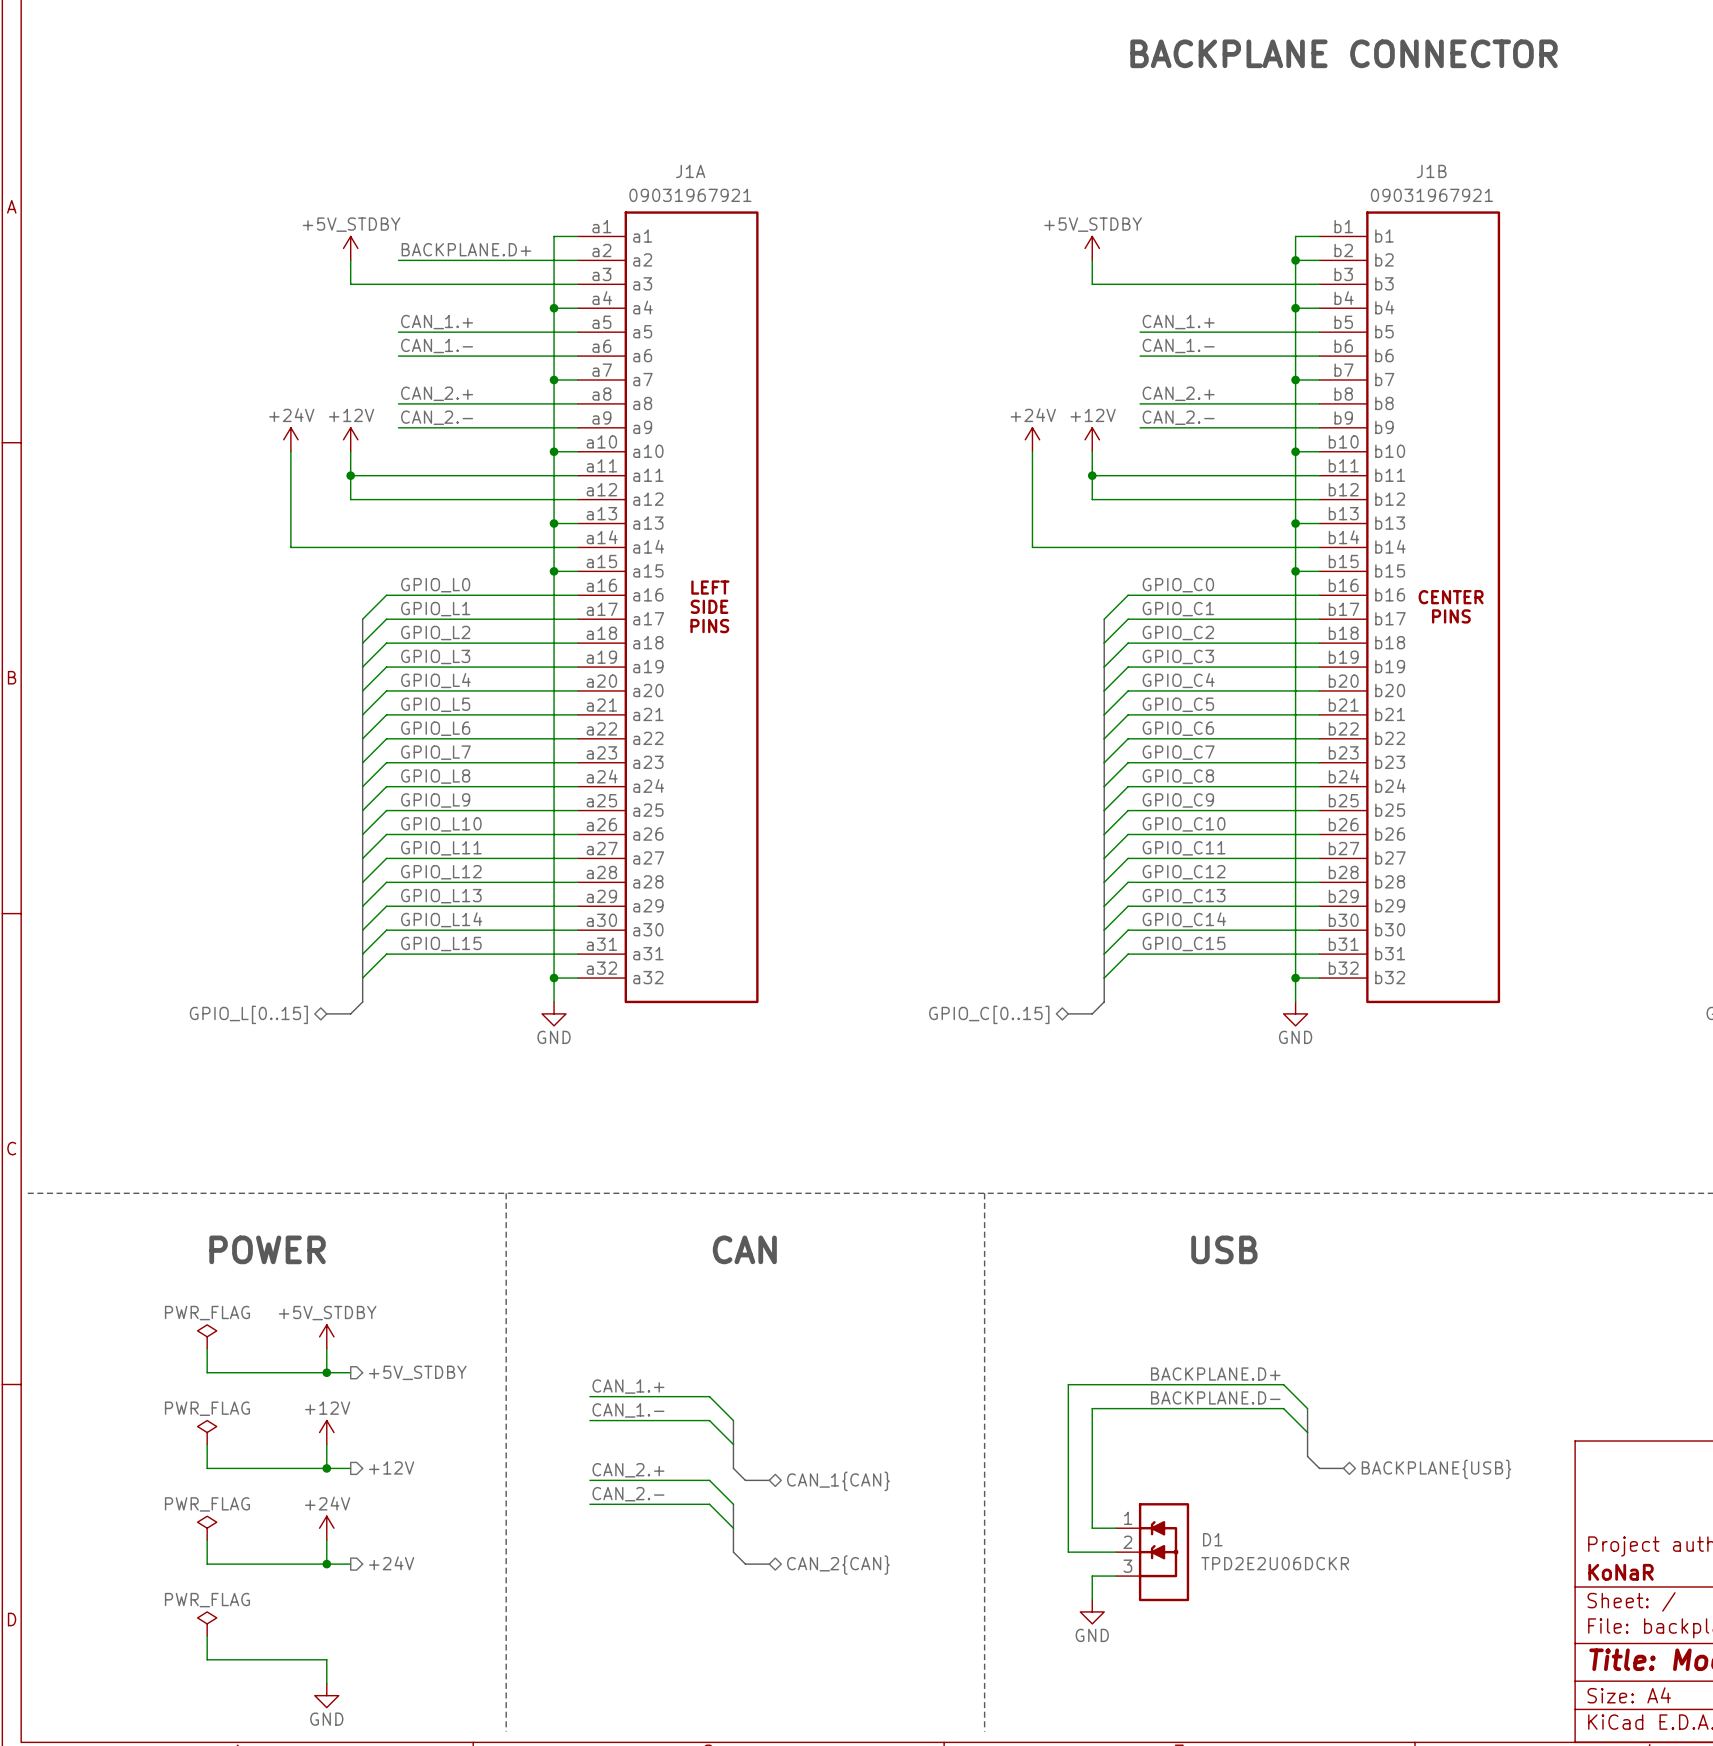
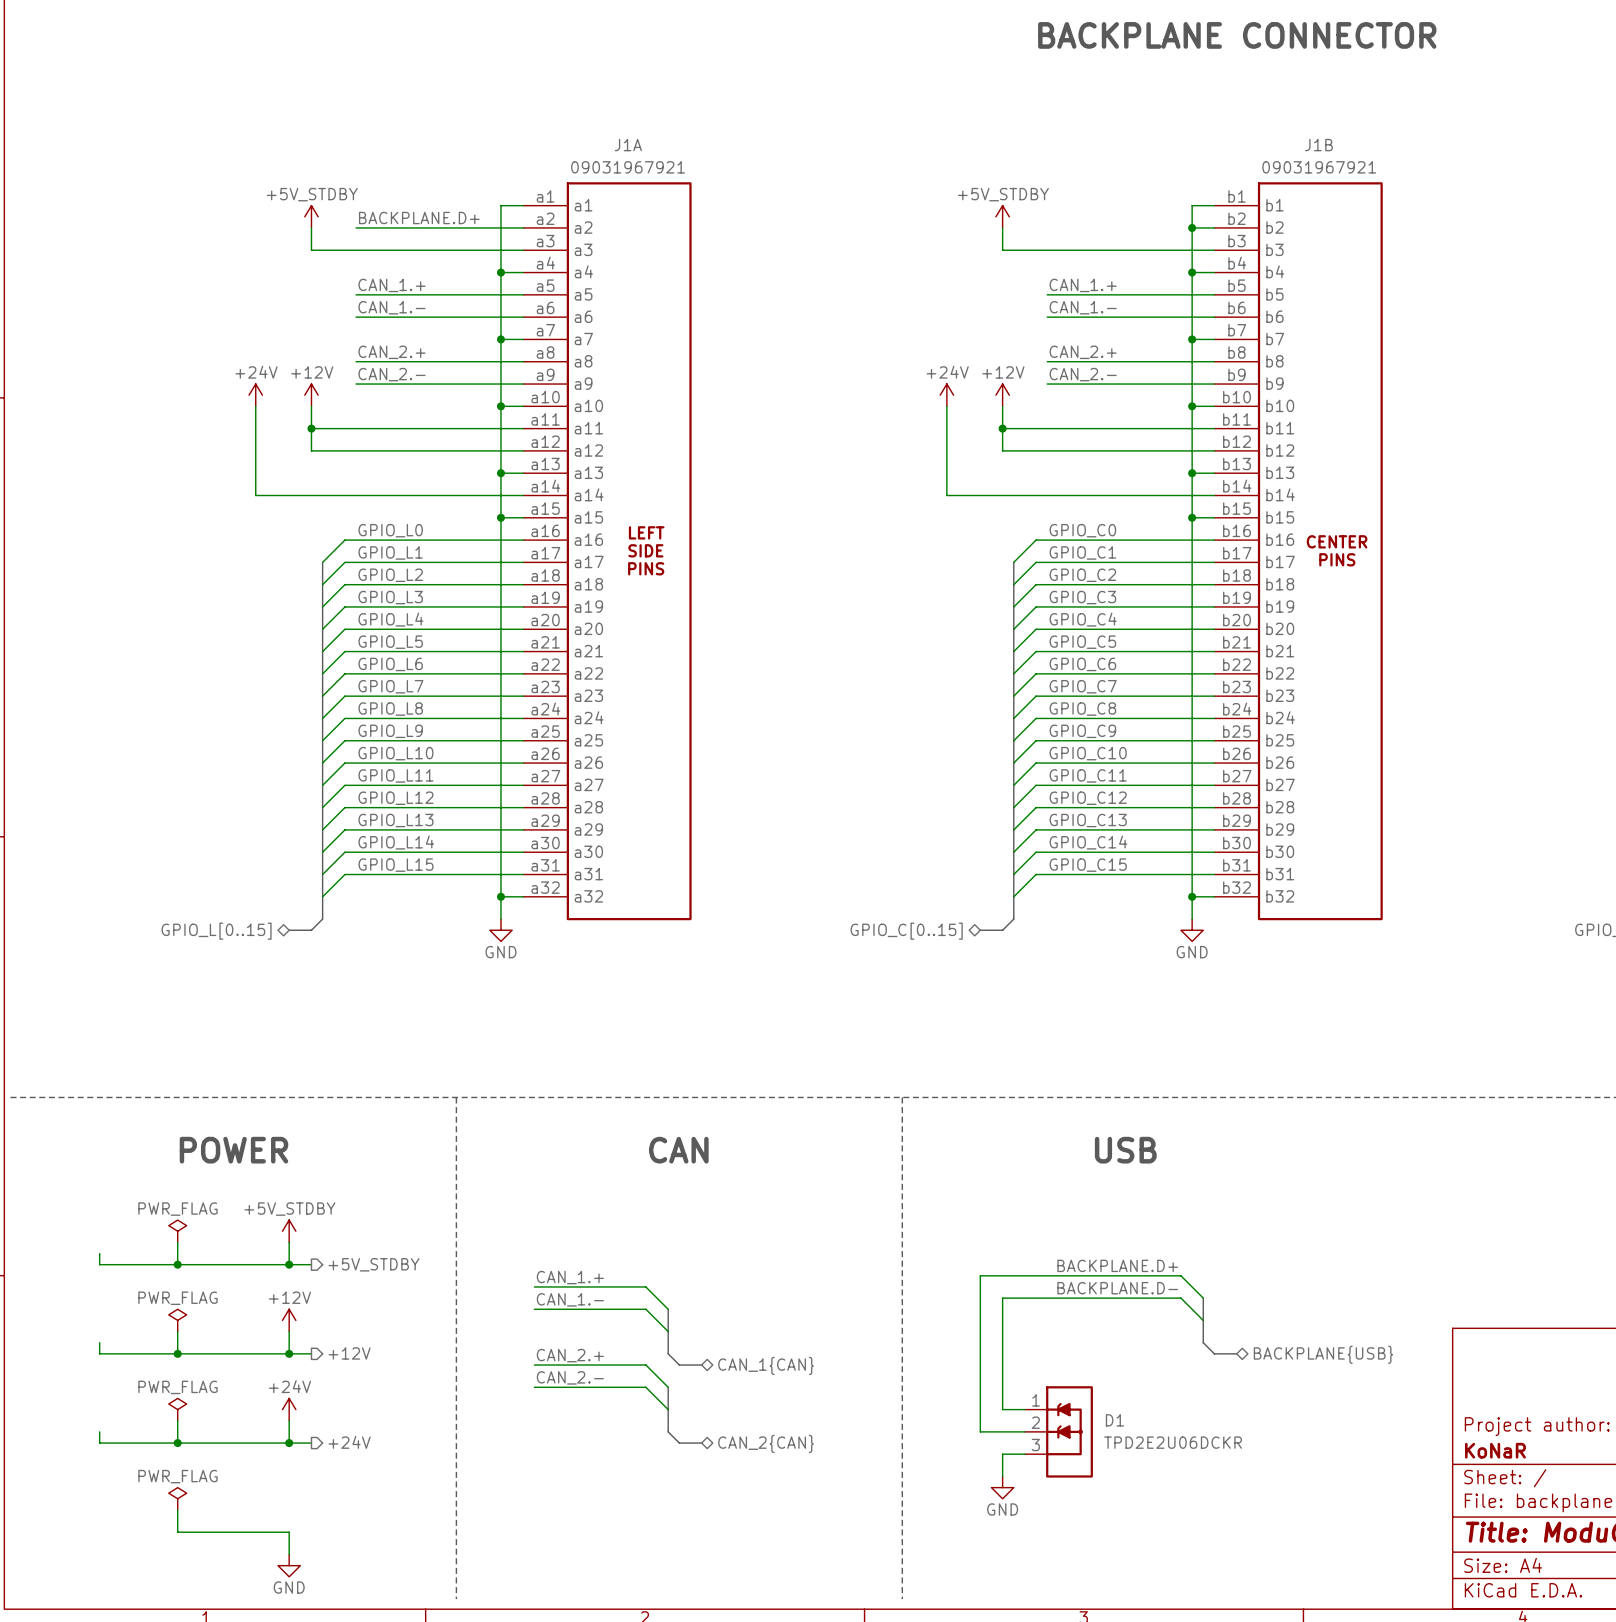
wire: none -> (99, 1253) (99, 1264) (177, 1264)
junction: none -> (177, 1264)
wire: none -> (99, 1342) (99, 1353) (177, 1353)
junction: none -> (177, 1353)
wire: none -> (99, 1431) (99, 1443) (177, 1443)
junction: none -> (177, 1443)

